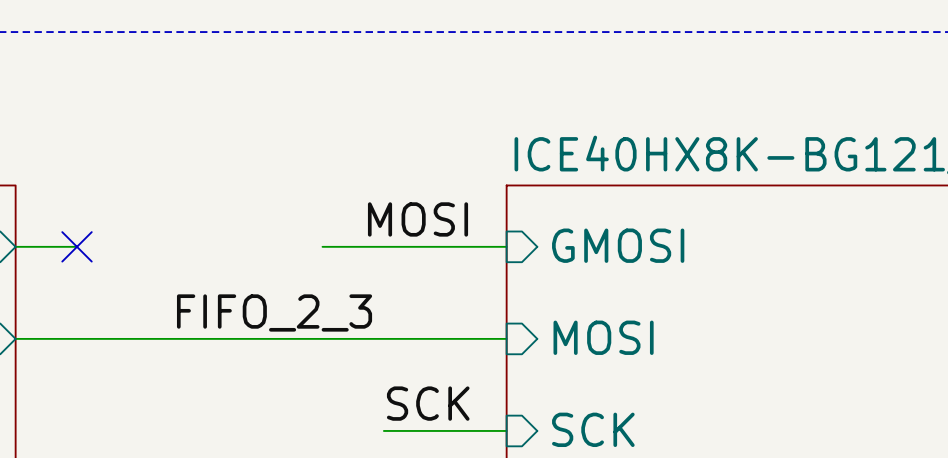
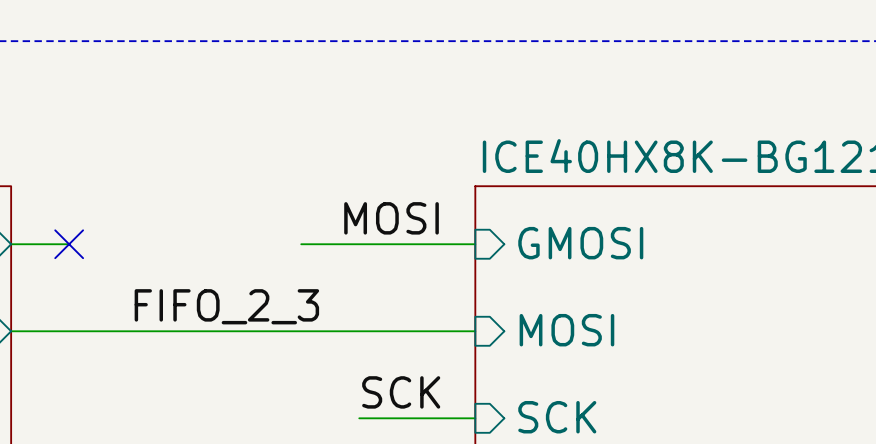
label position: FIFO_2_3 (274, 312) -> FIFO_2_3 (226, 306)

